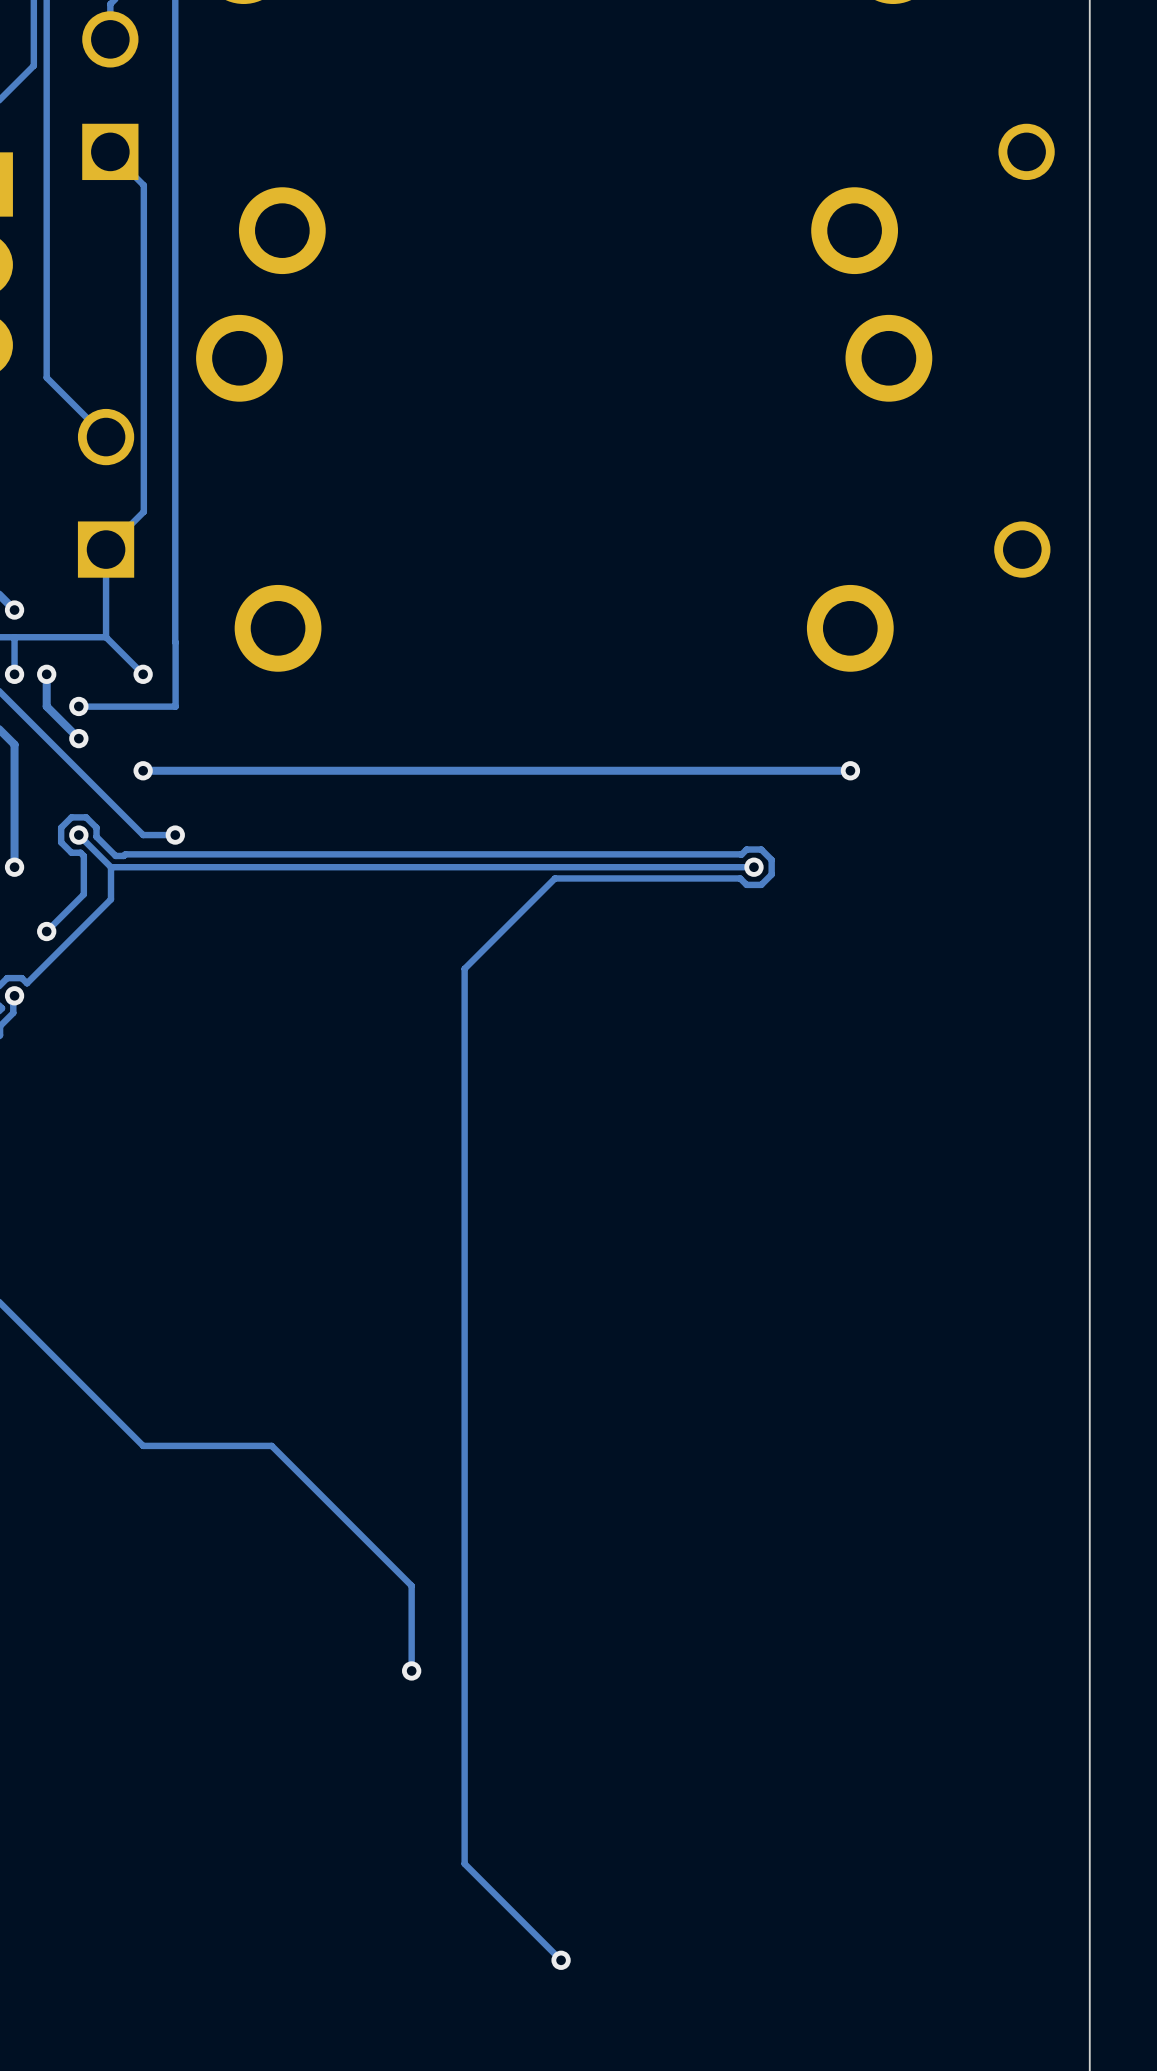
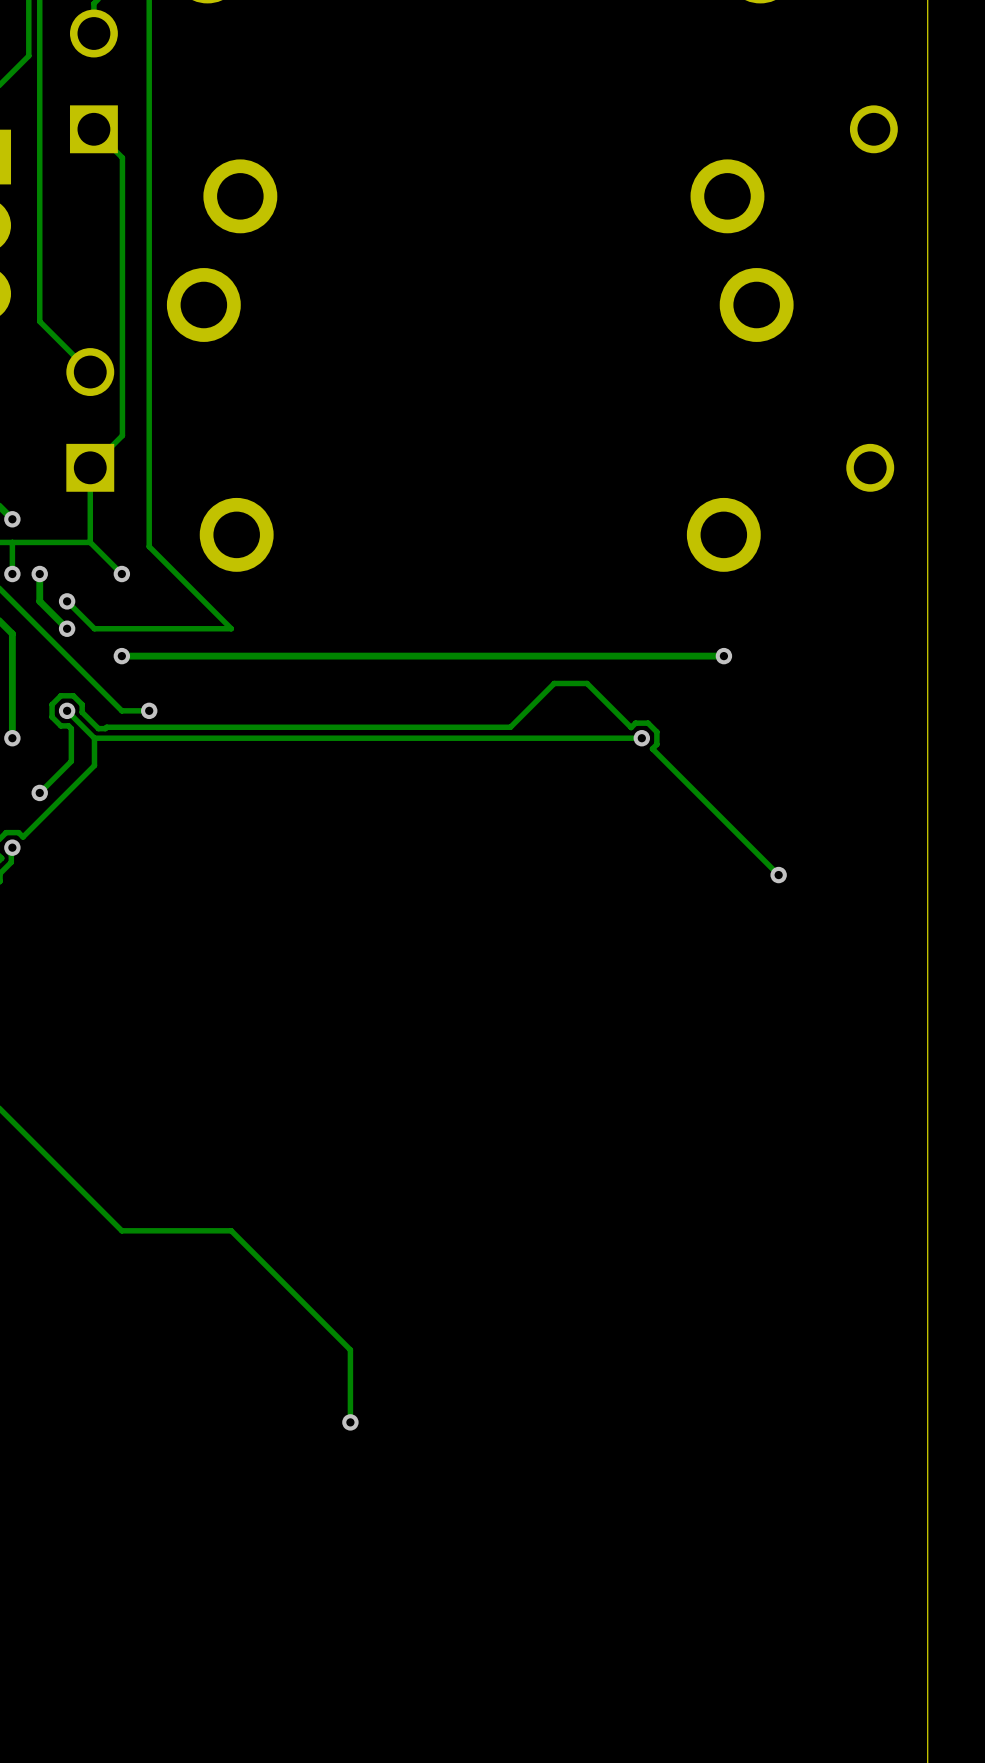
track: (175, 642) (175, 706) (79, 706) -> (149, 546) (231, 628) (94, 628) (67, 601)
track: (741, 854) (599, 854) -> (630, 727) (587, 683) (554, 683) (510, 727)
track: (766, 879) (761, 884) (746, 884) (740, 878) (554, 878) (464, 968) (464, 1863) (561, 1960) -> (652, 748) (778, 875)
via: none -> (778, 875)
via: (561, 1960) -> none

